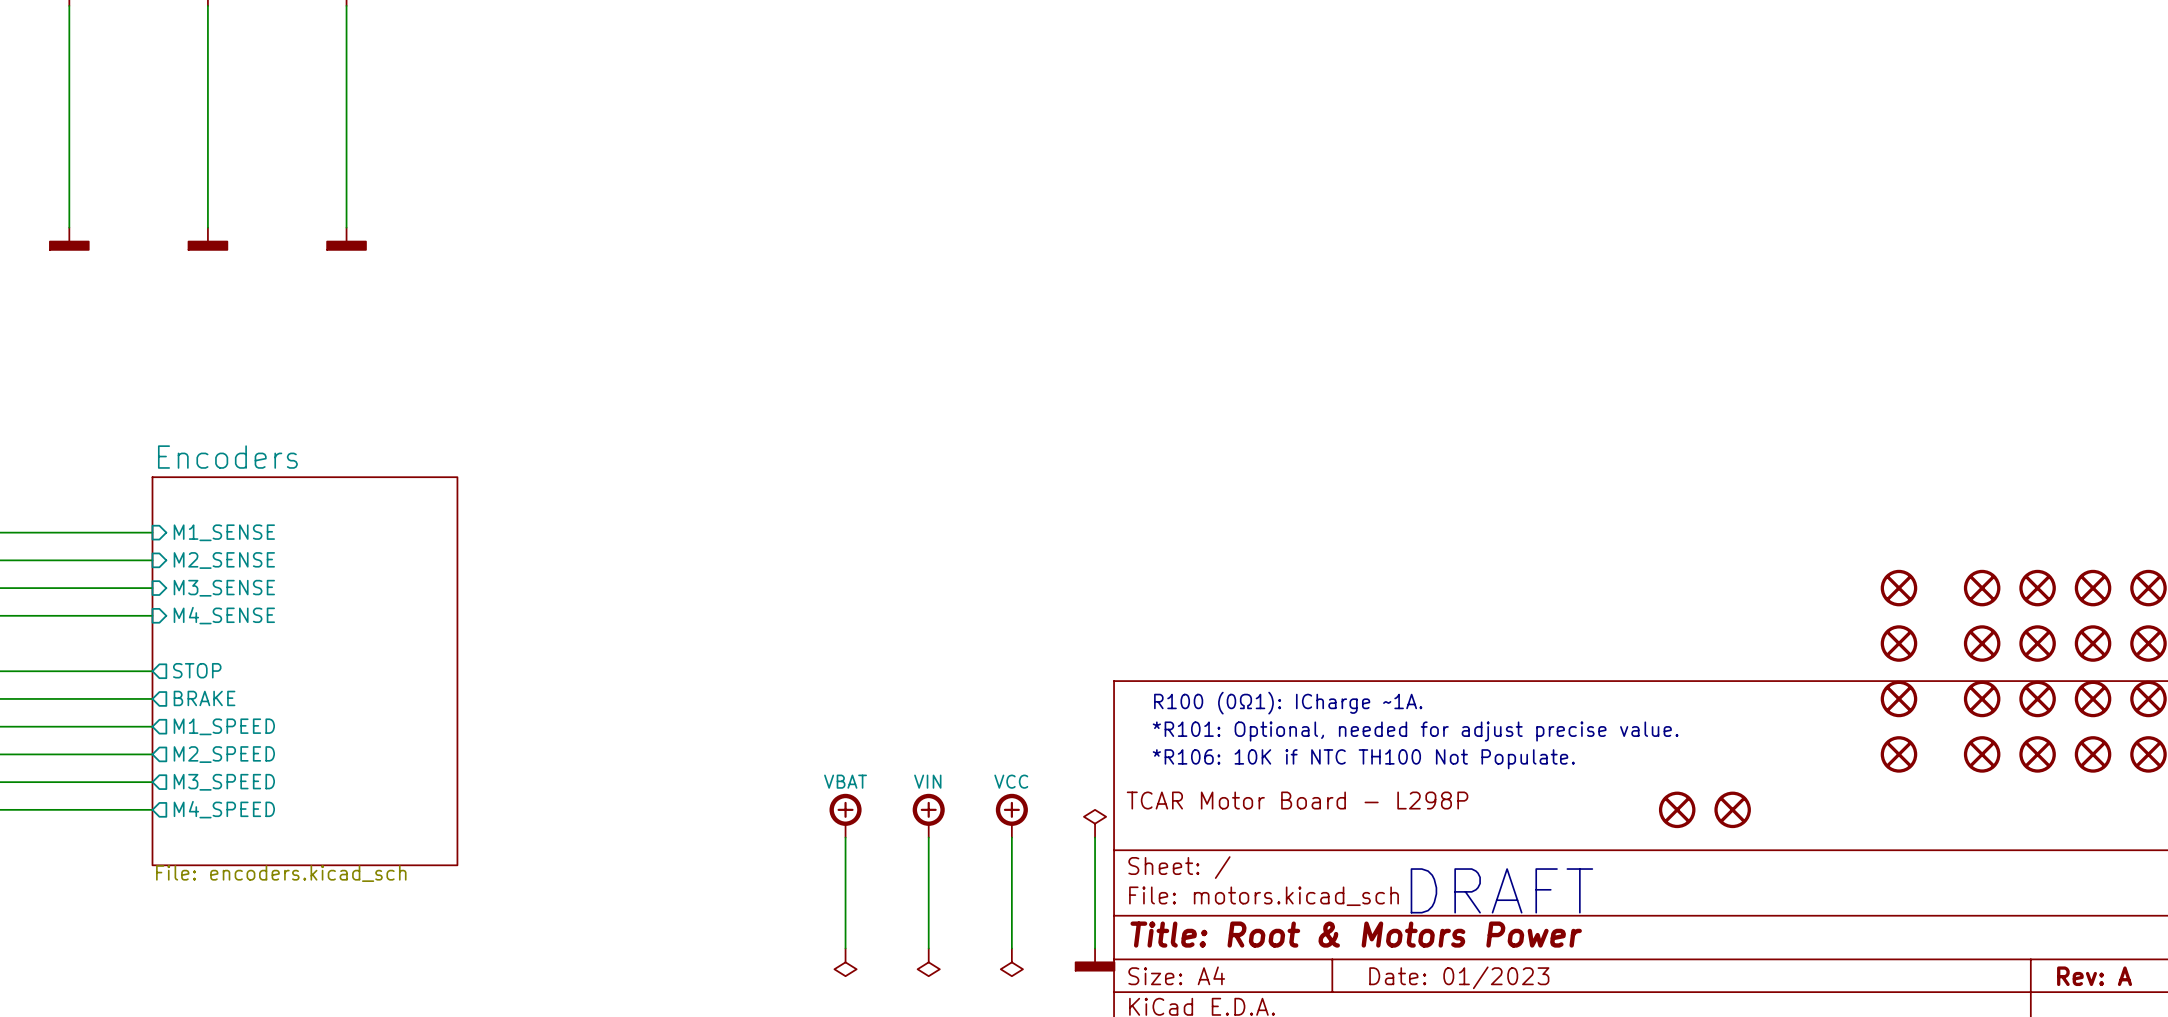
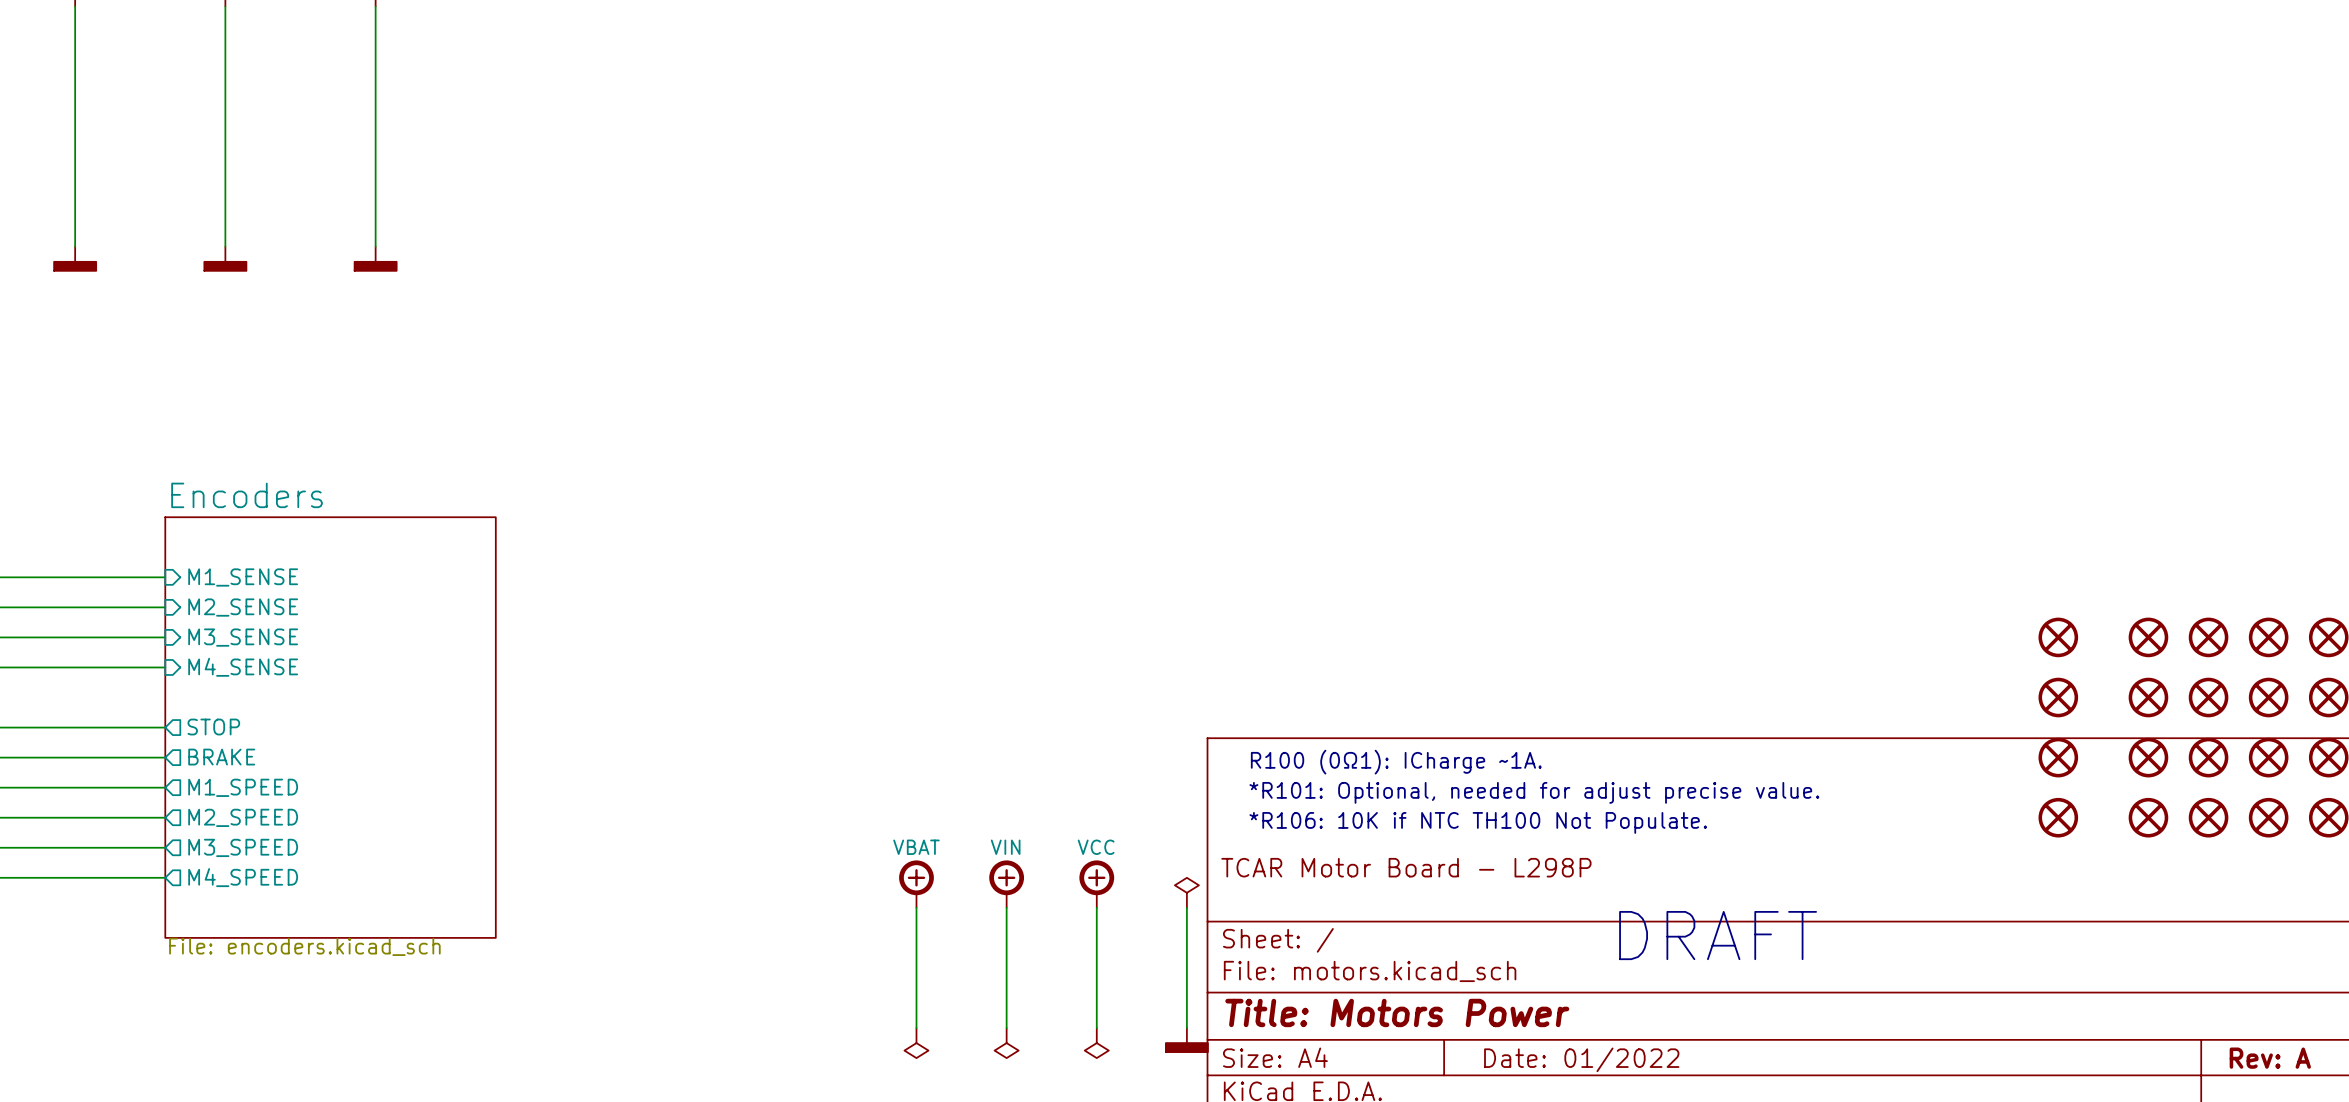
part: (1677, 809) -> none
part: (1732, 809) -> none
text position: DRAFT (1501, 890) -> DRAFT (1718, 935)
title block: Title: Root & Motors Power (1356, 934) -> Title: Motors Power (1397, 1012)
title block: Date: 01/2023 (1459, 977) -> Date: 01/2022 (1581, 1059)

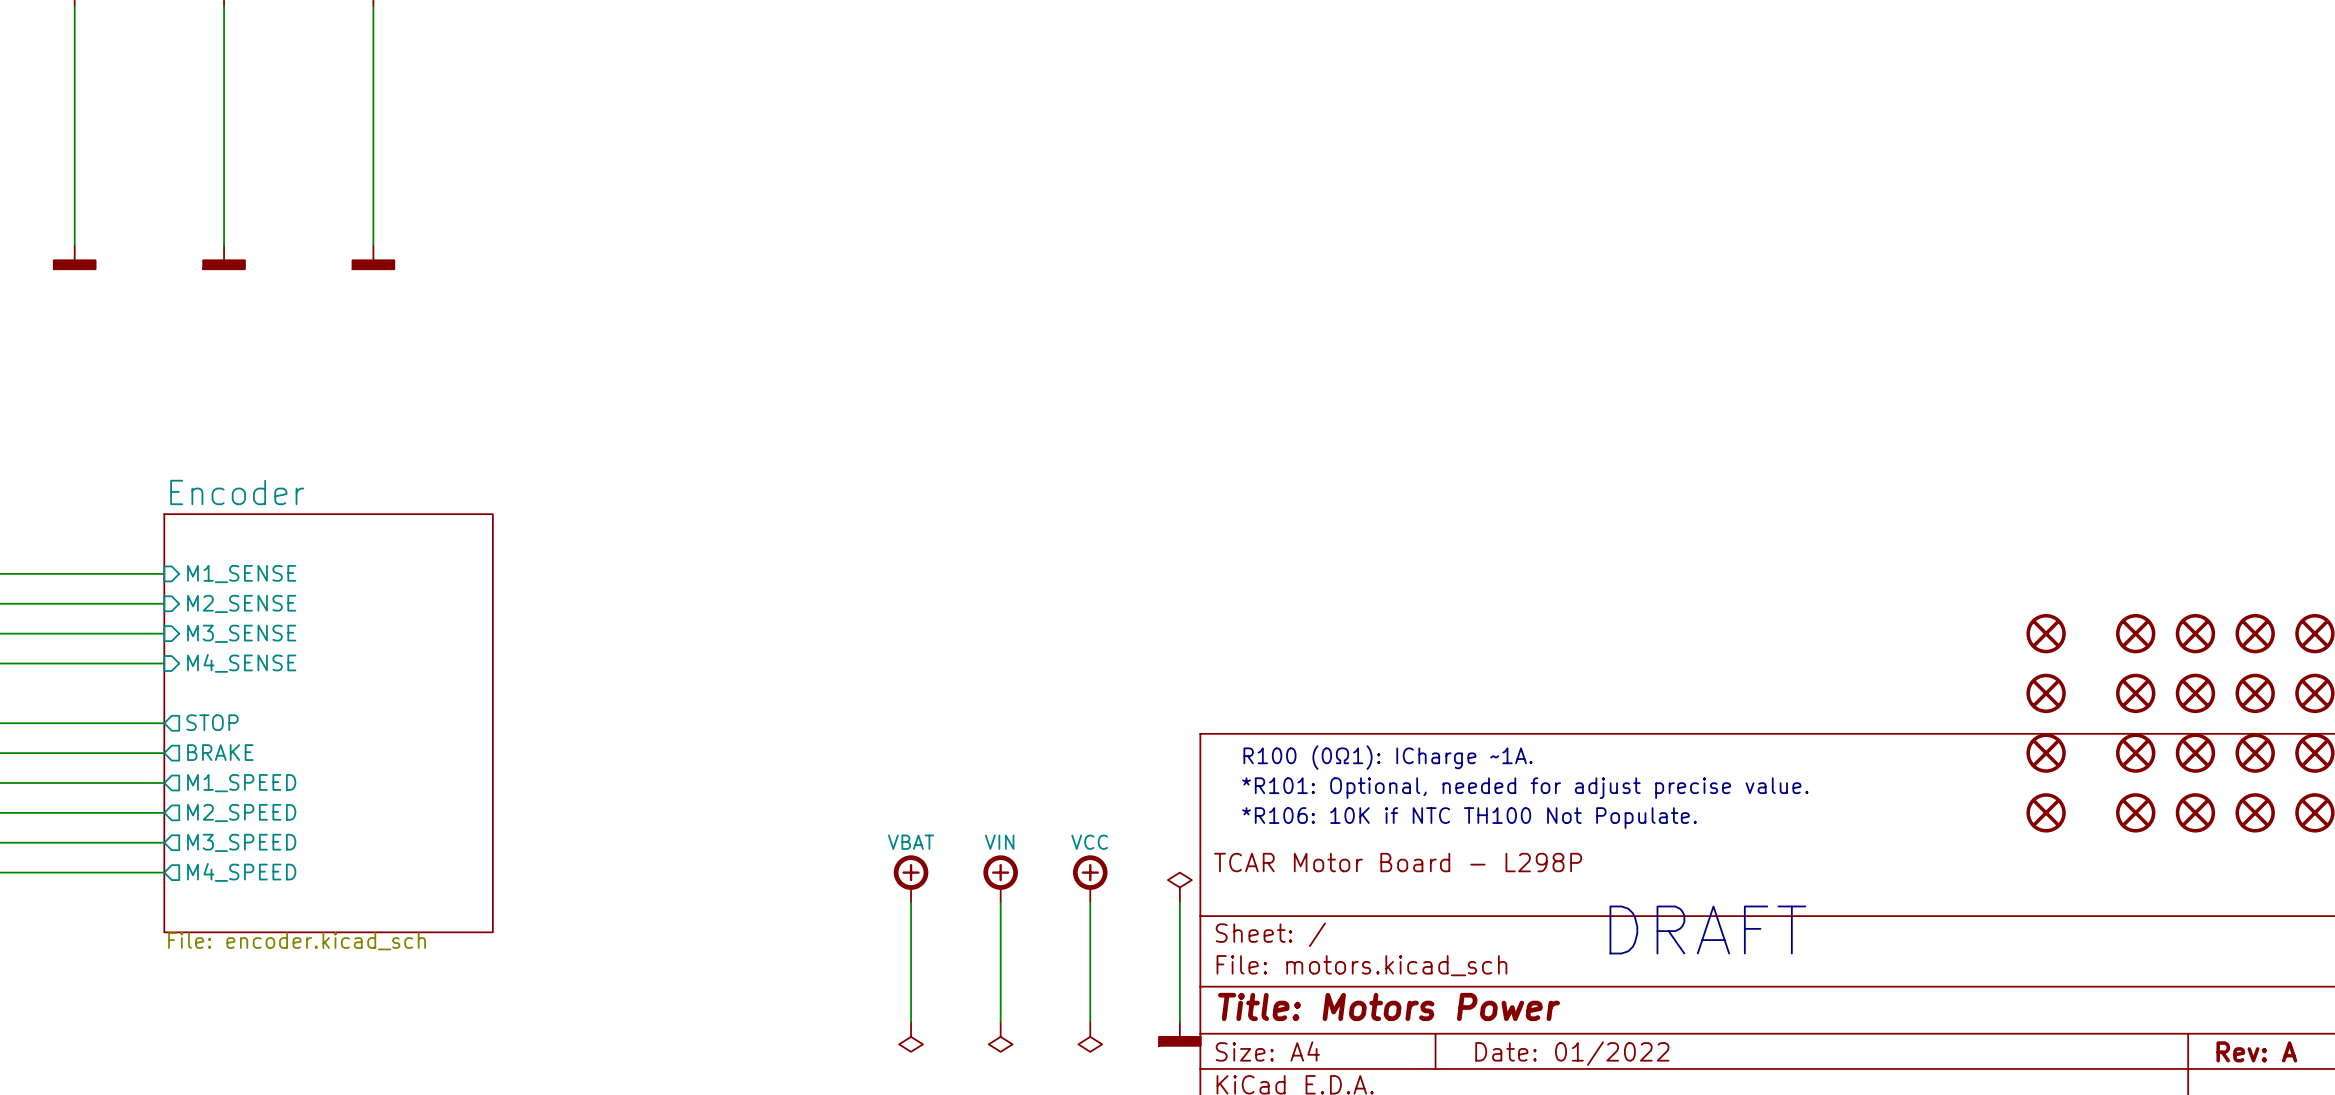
sheet Encoders name: Encoders (247, 495) -> Encoder (237, 492)
sheet Encoders value: File: encoders.kicad_sch (304, 946) -> File: encoder.kicad_sch (297, 941)

